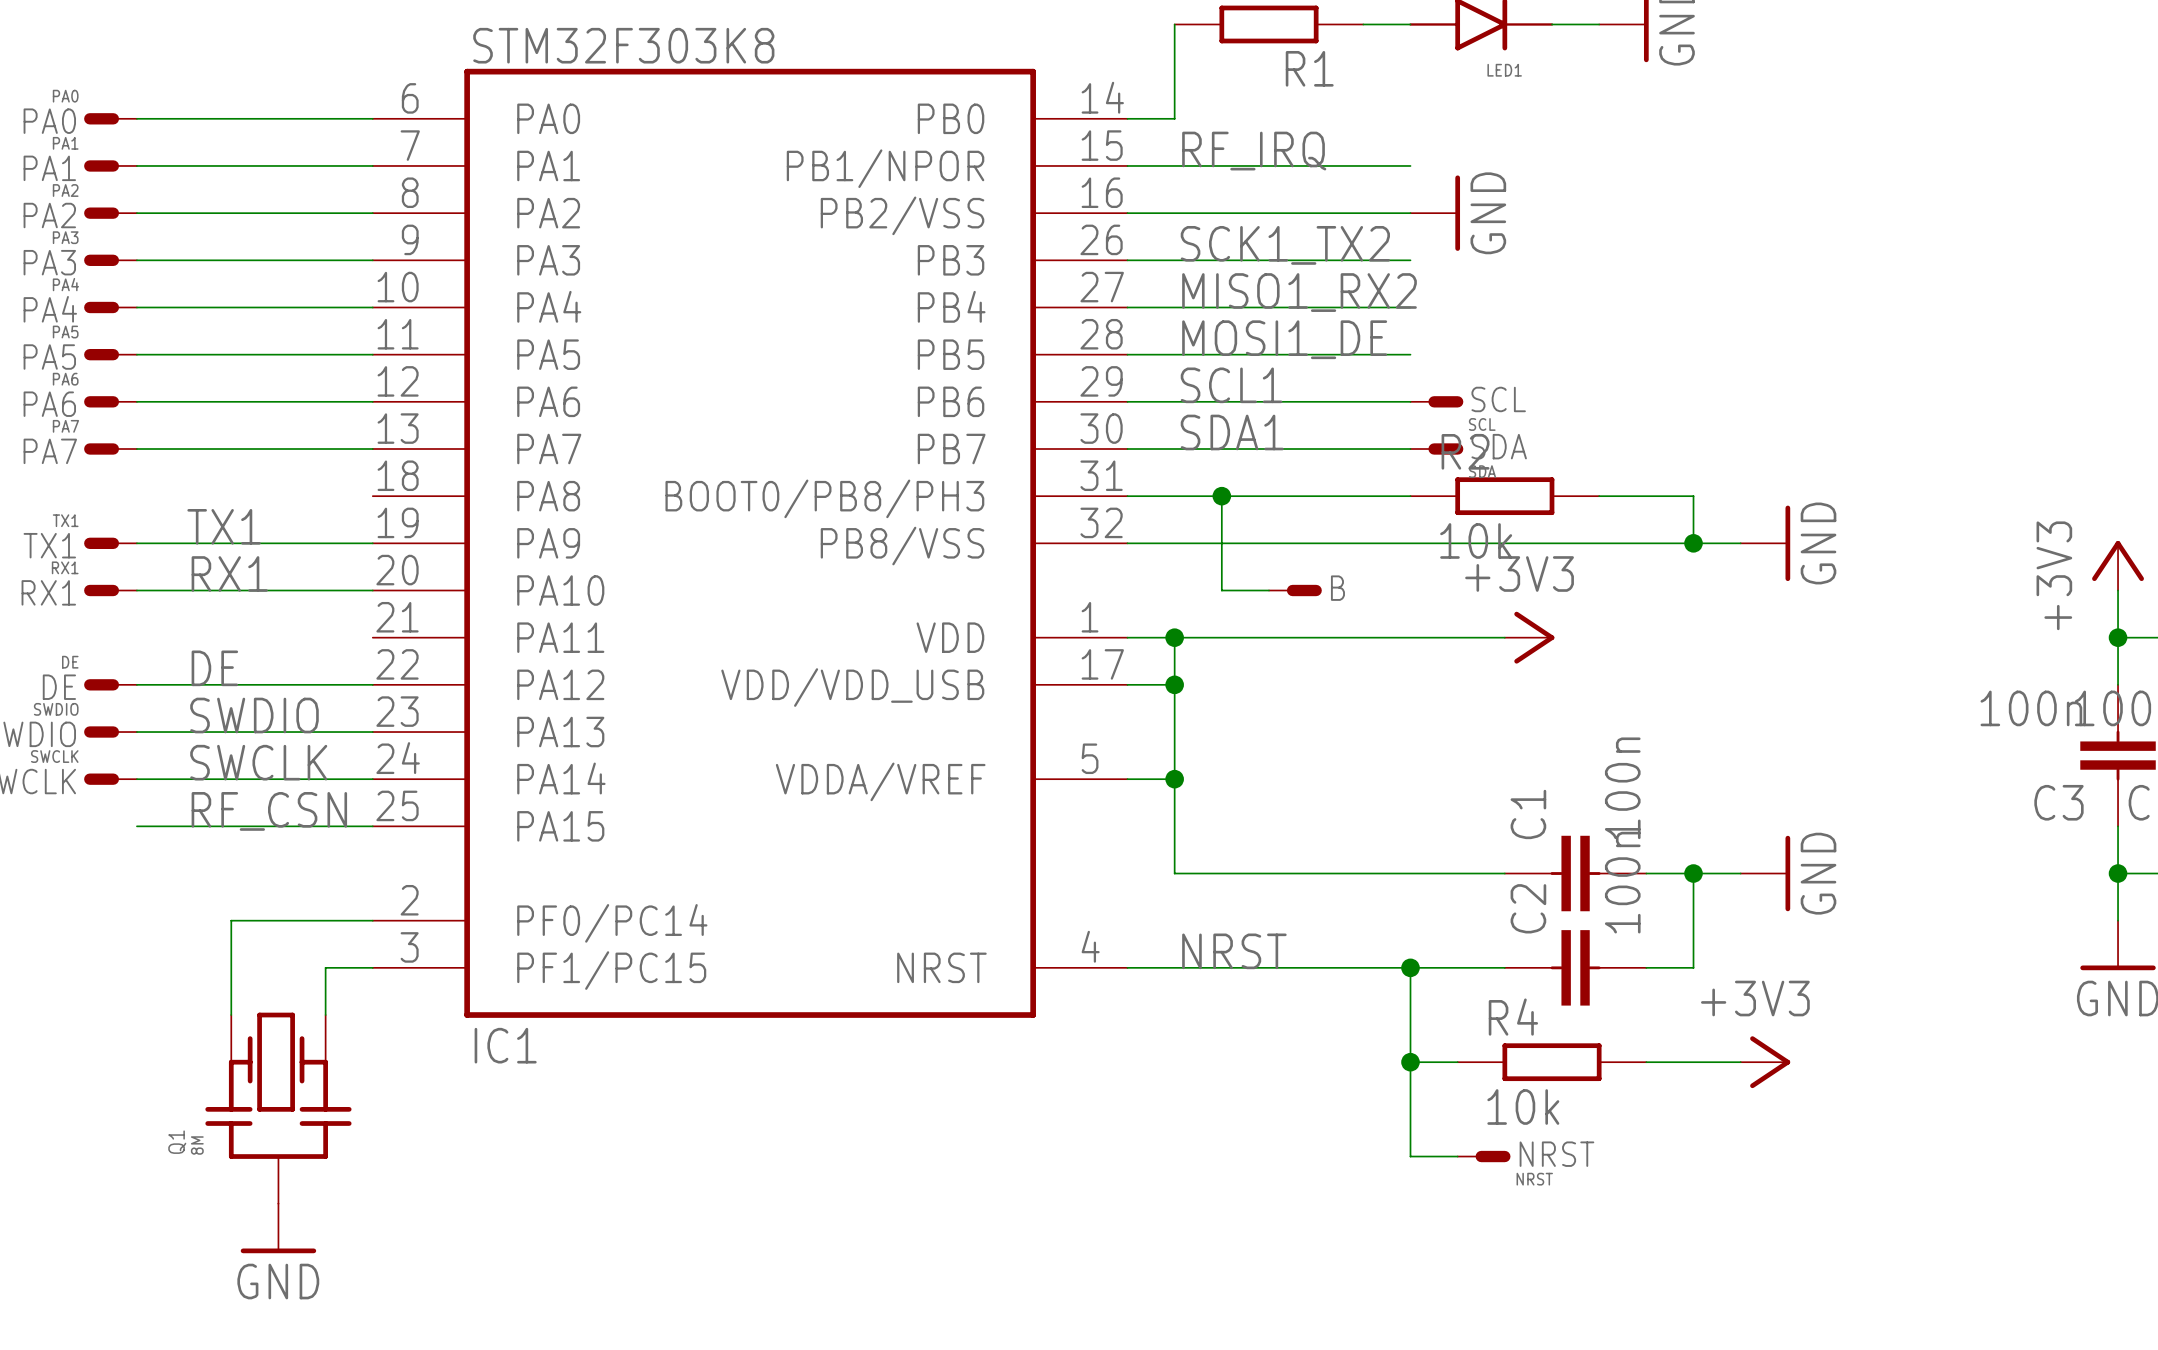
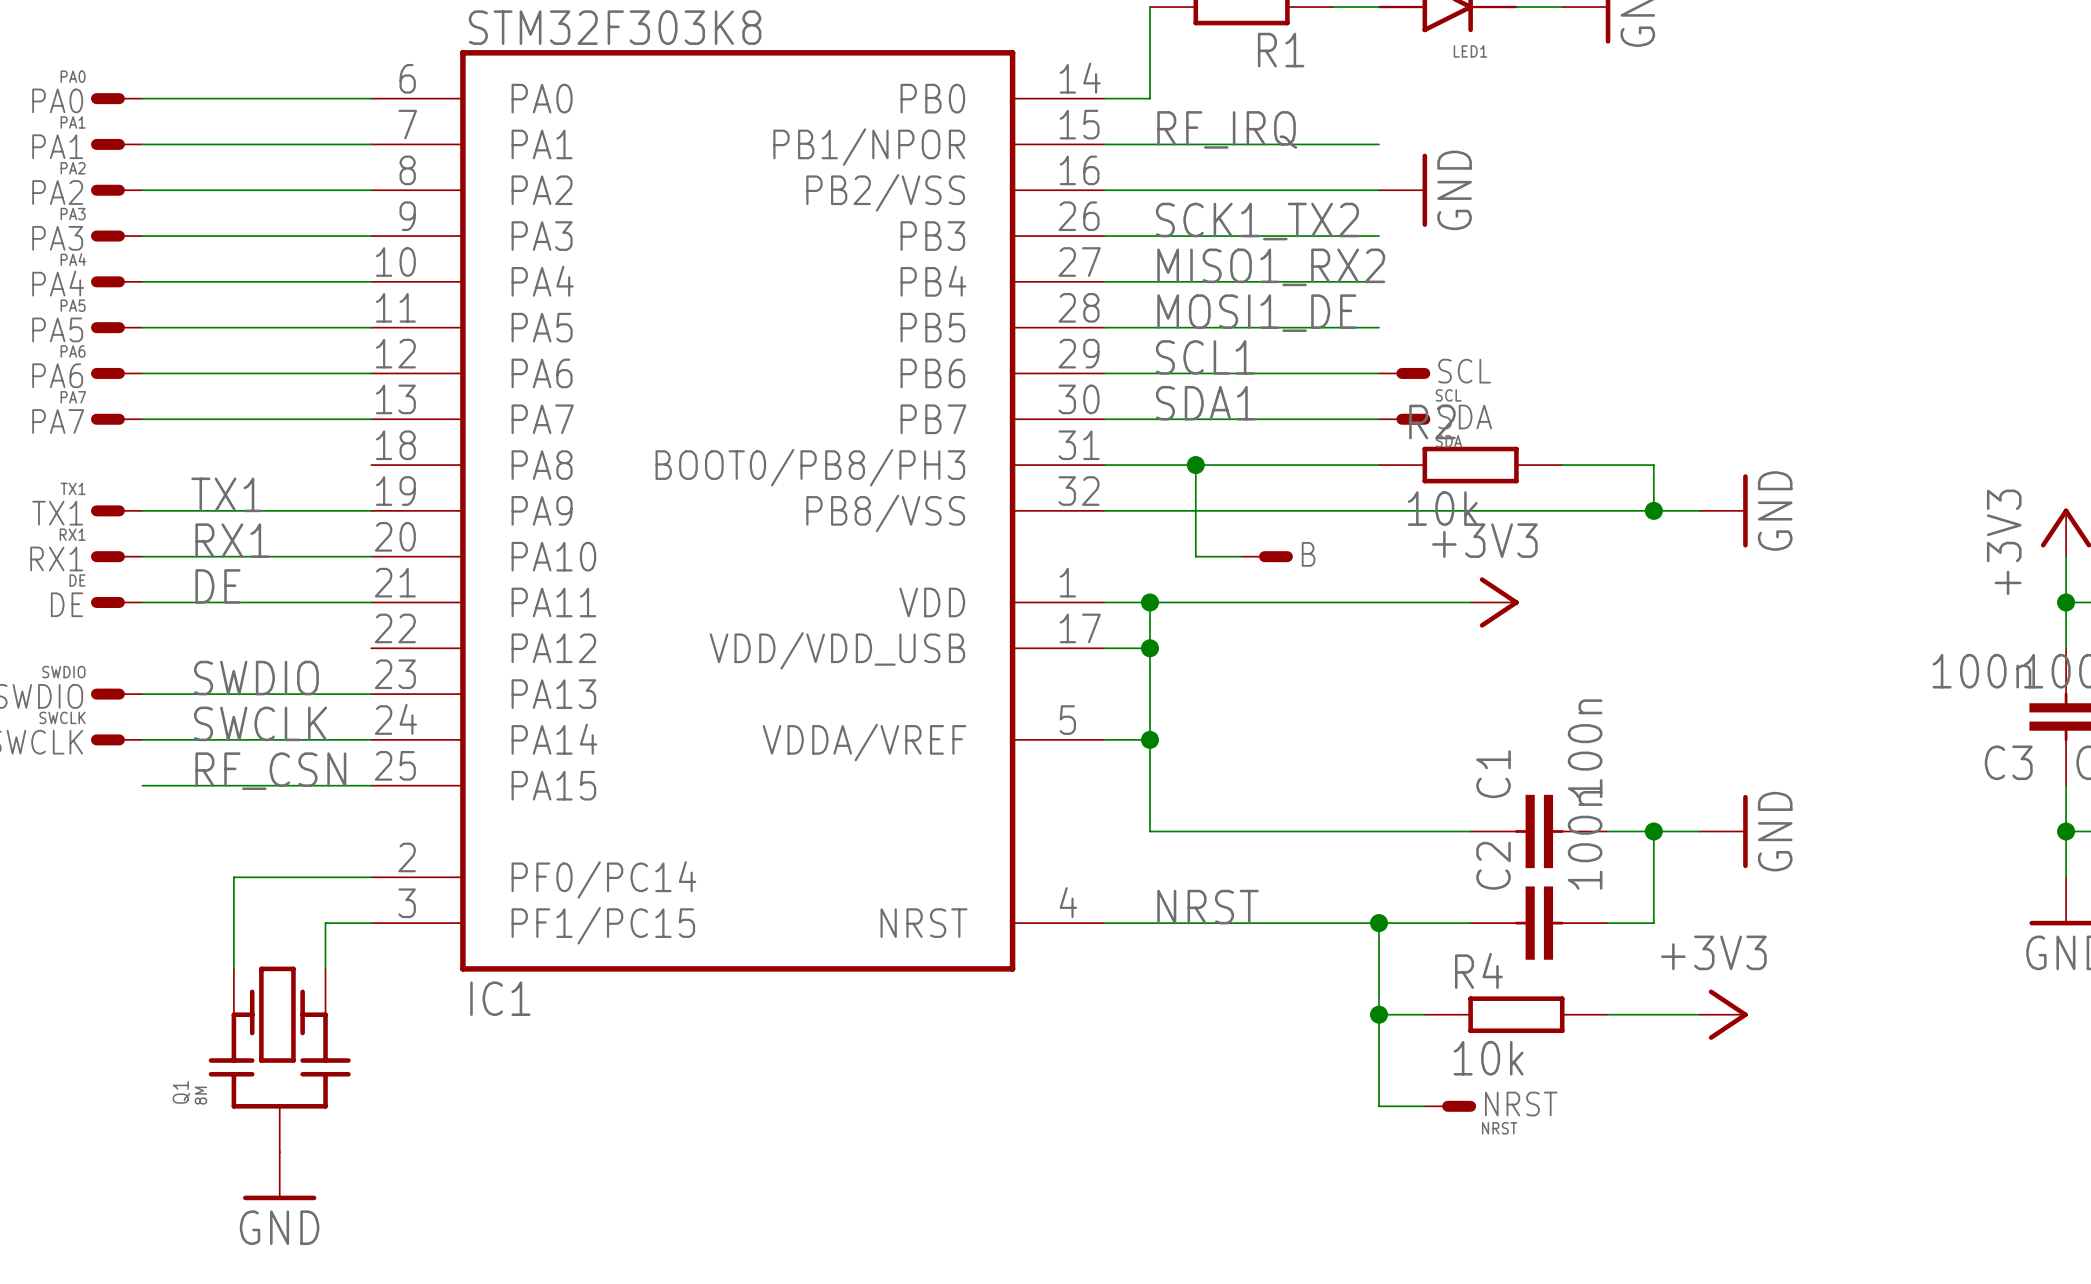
label position: DE (214, 668) -> DE (217, 586)
DE position: (110, 684) -> (116, 602)
wire: (136, 684) (372, 684) -> (142, 602) (371, 602)

